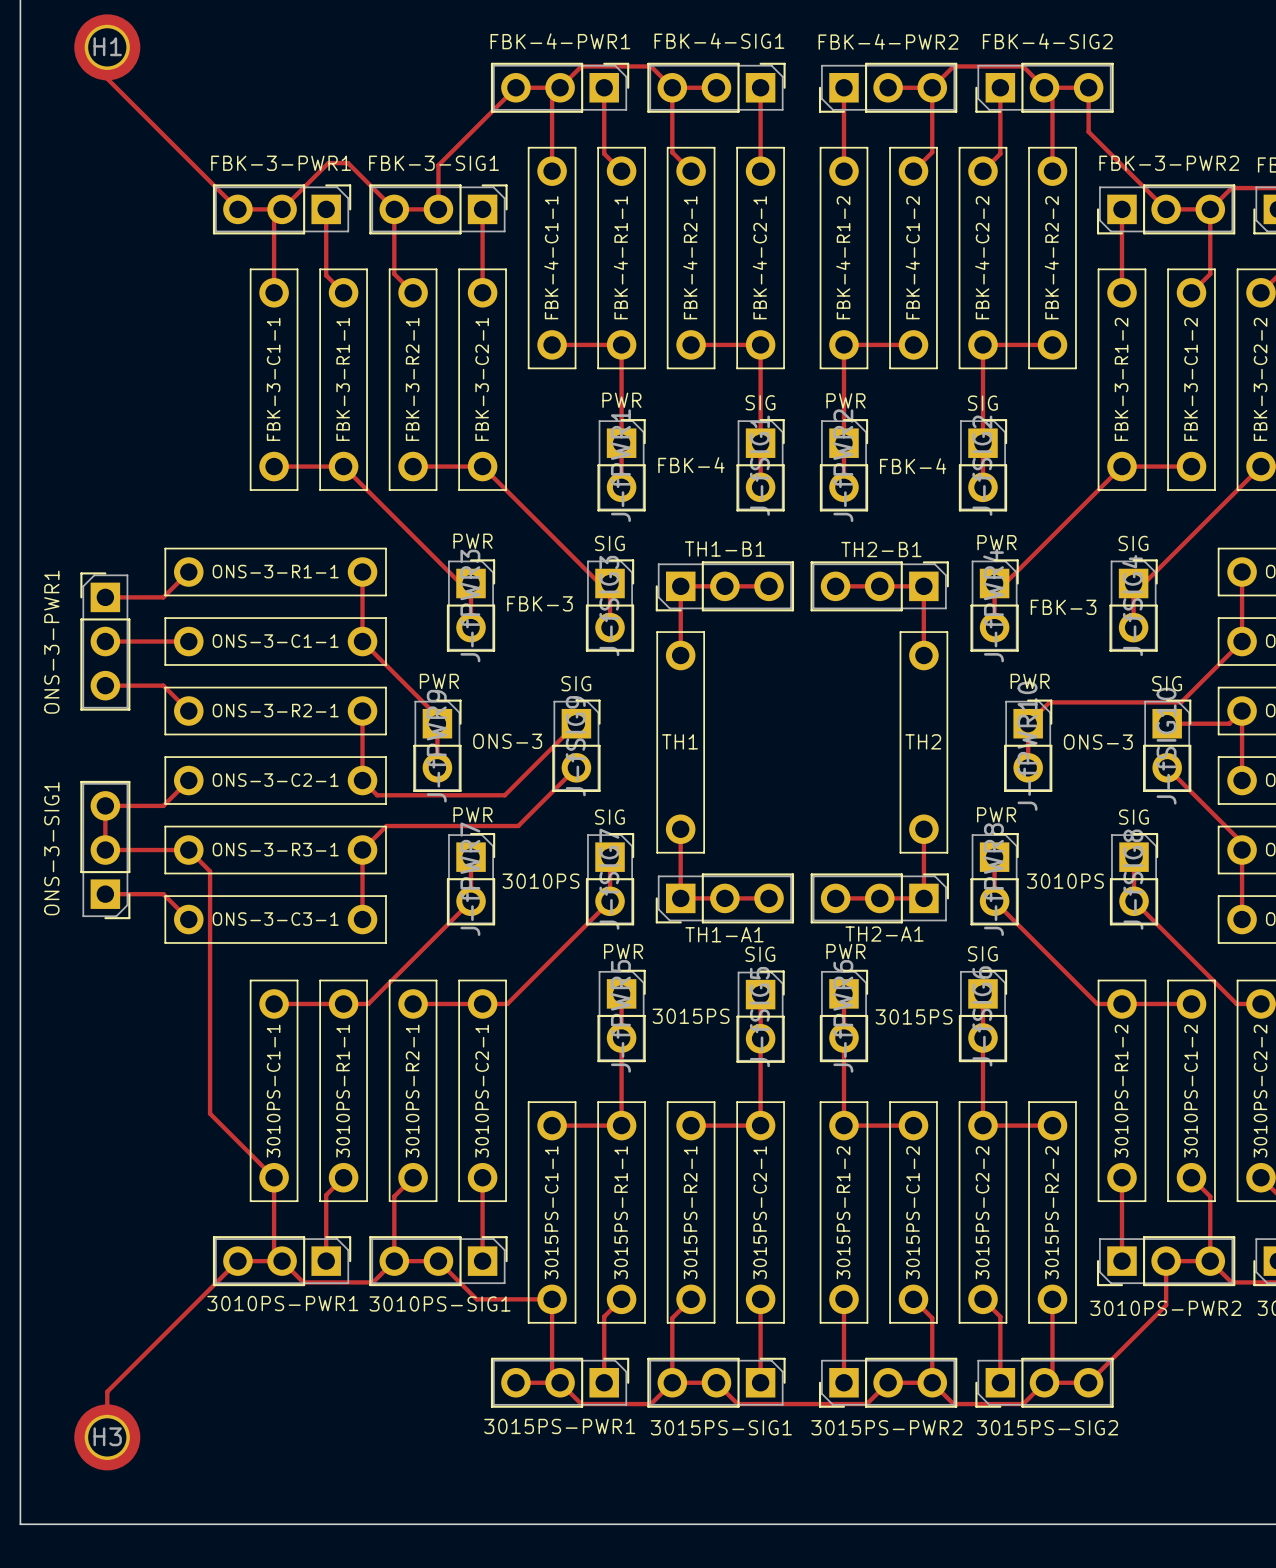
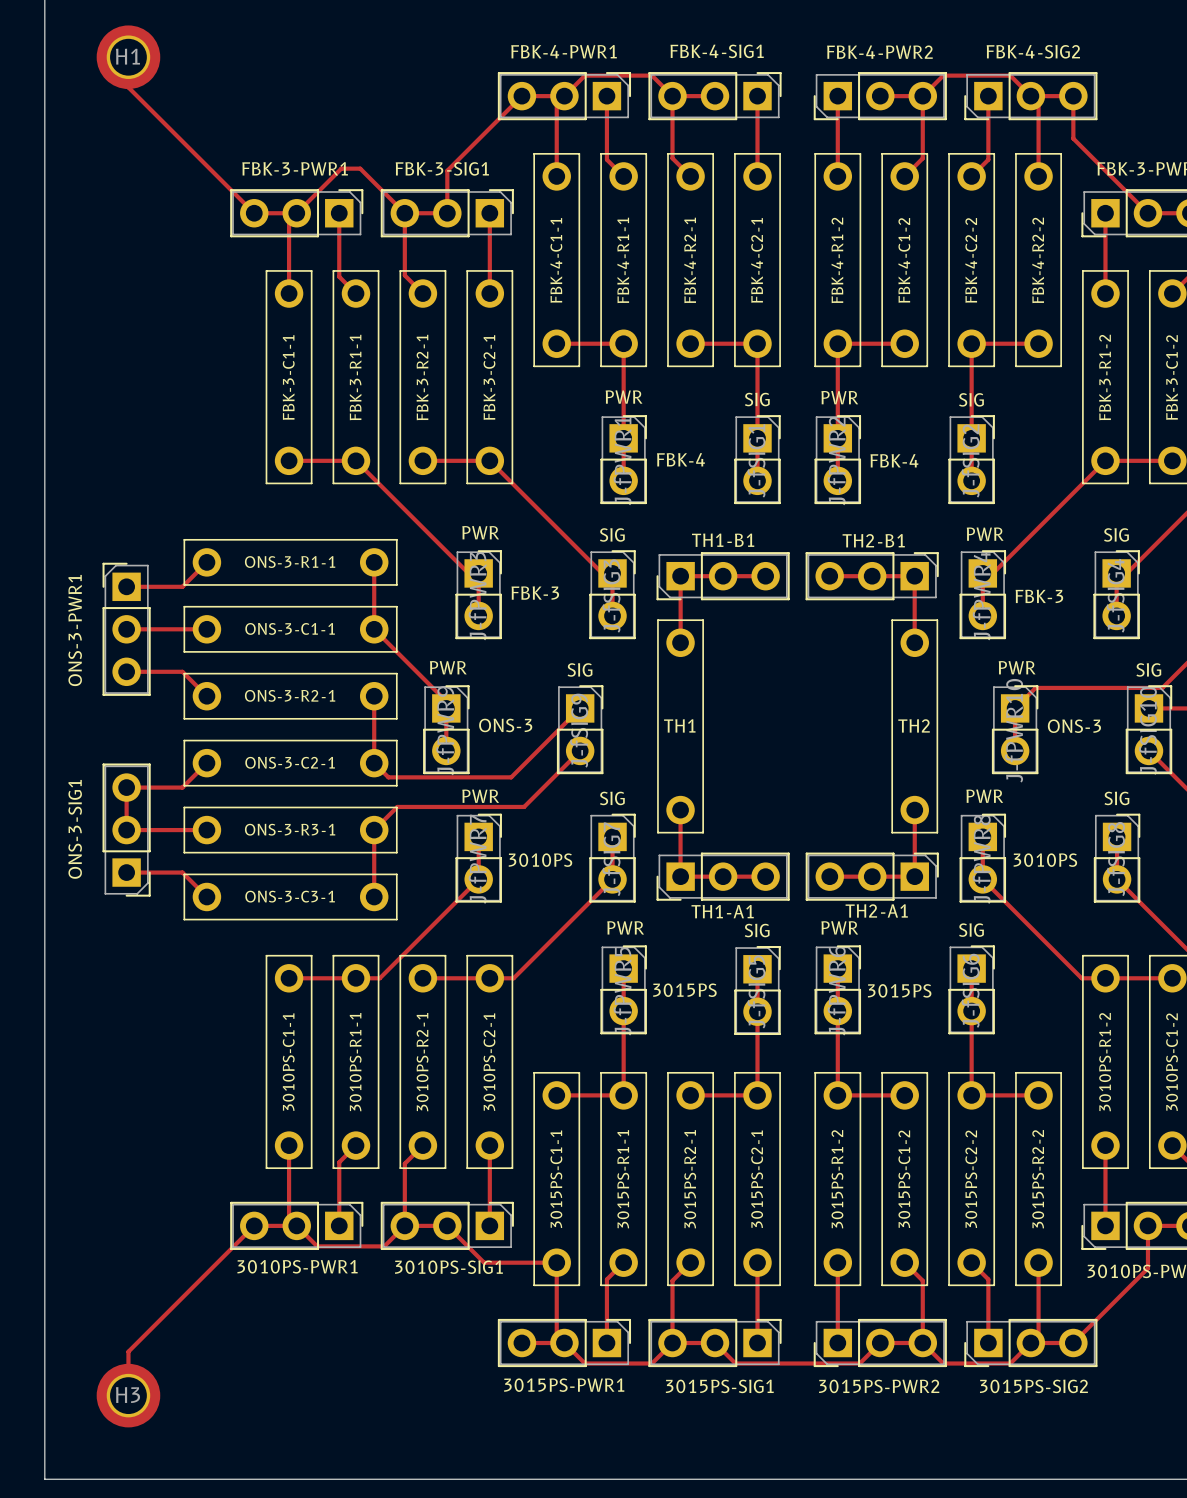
track: (188, 850) (210, 871) (210, 1113) (274, 1177) -> none

